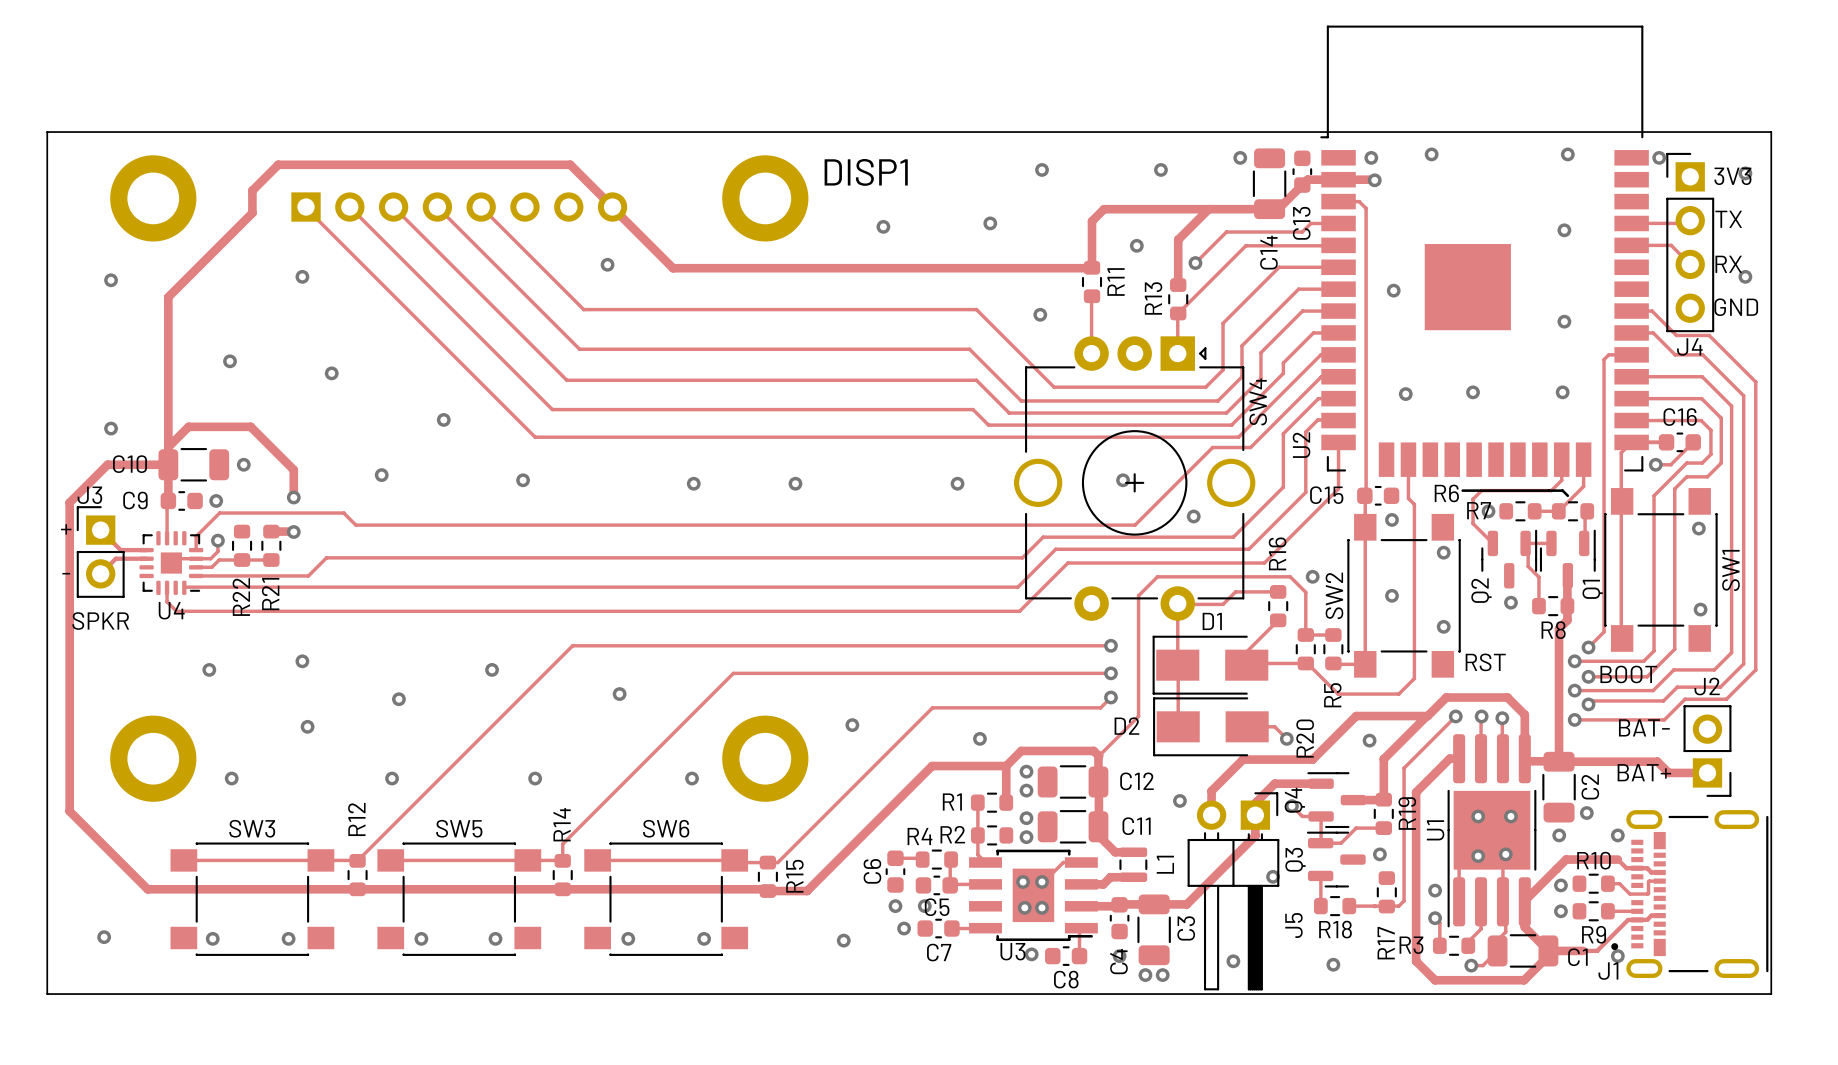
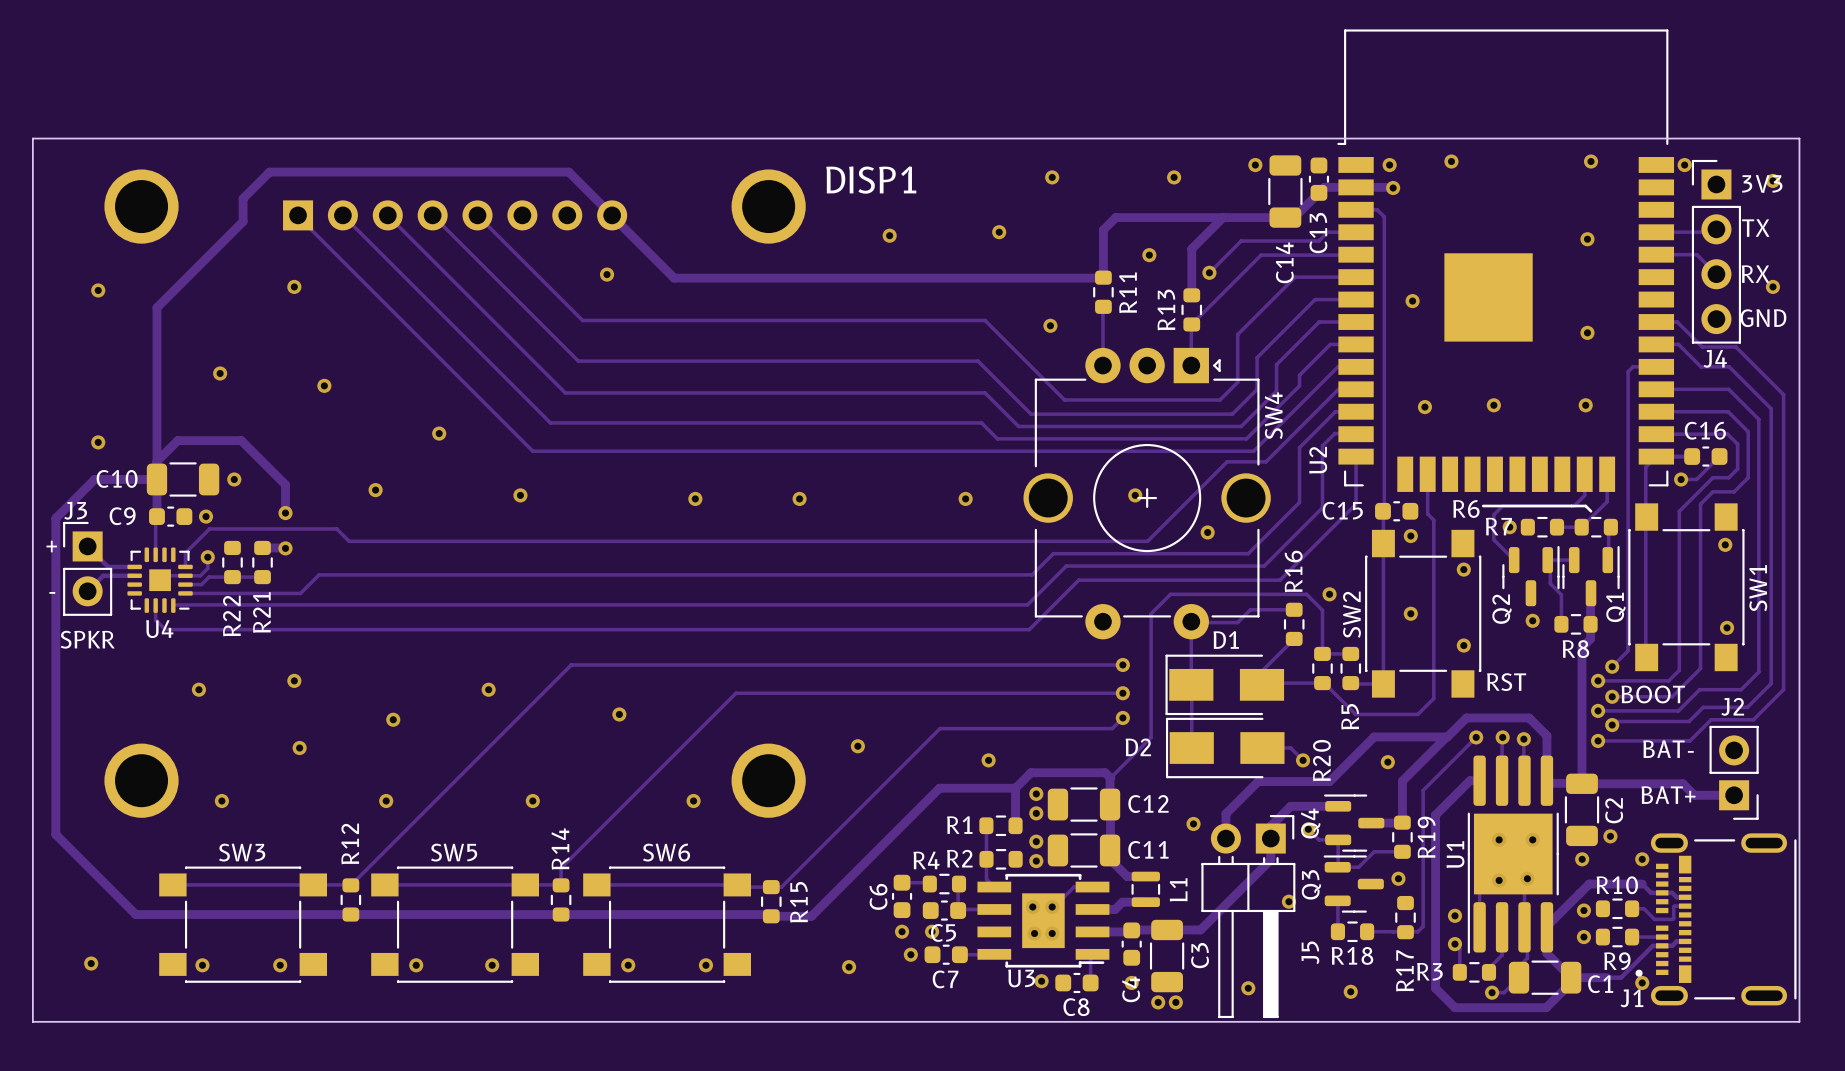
DISP1 footprint: [110, 155, 809, 802] -> [104, 169, 806, 818]

